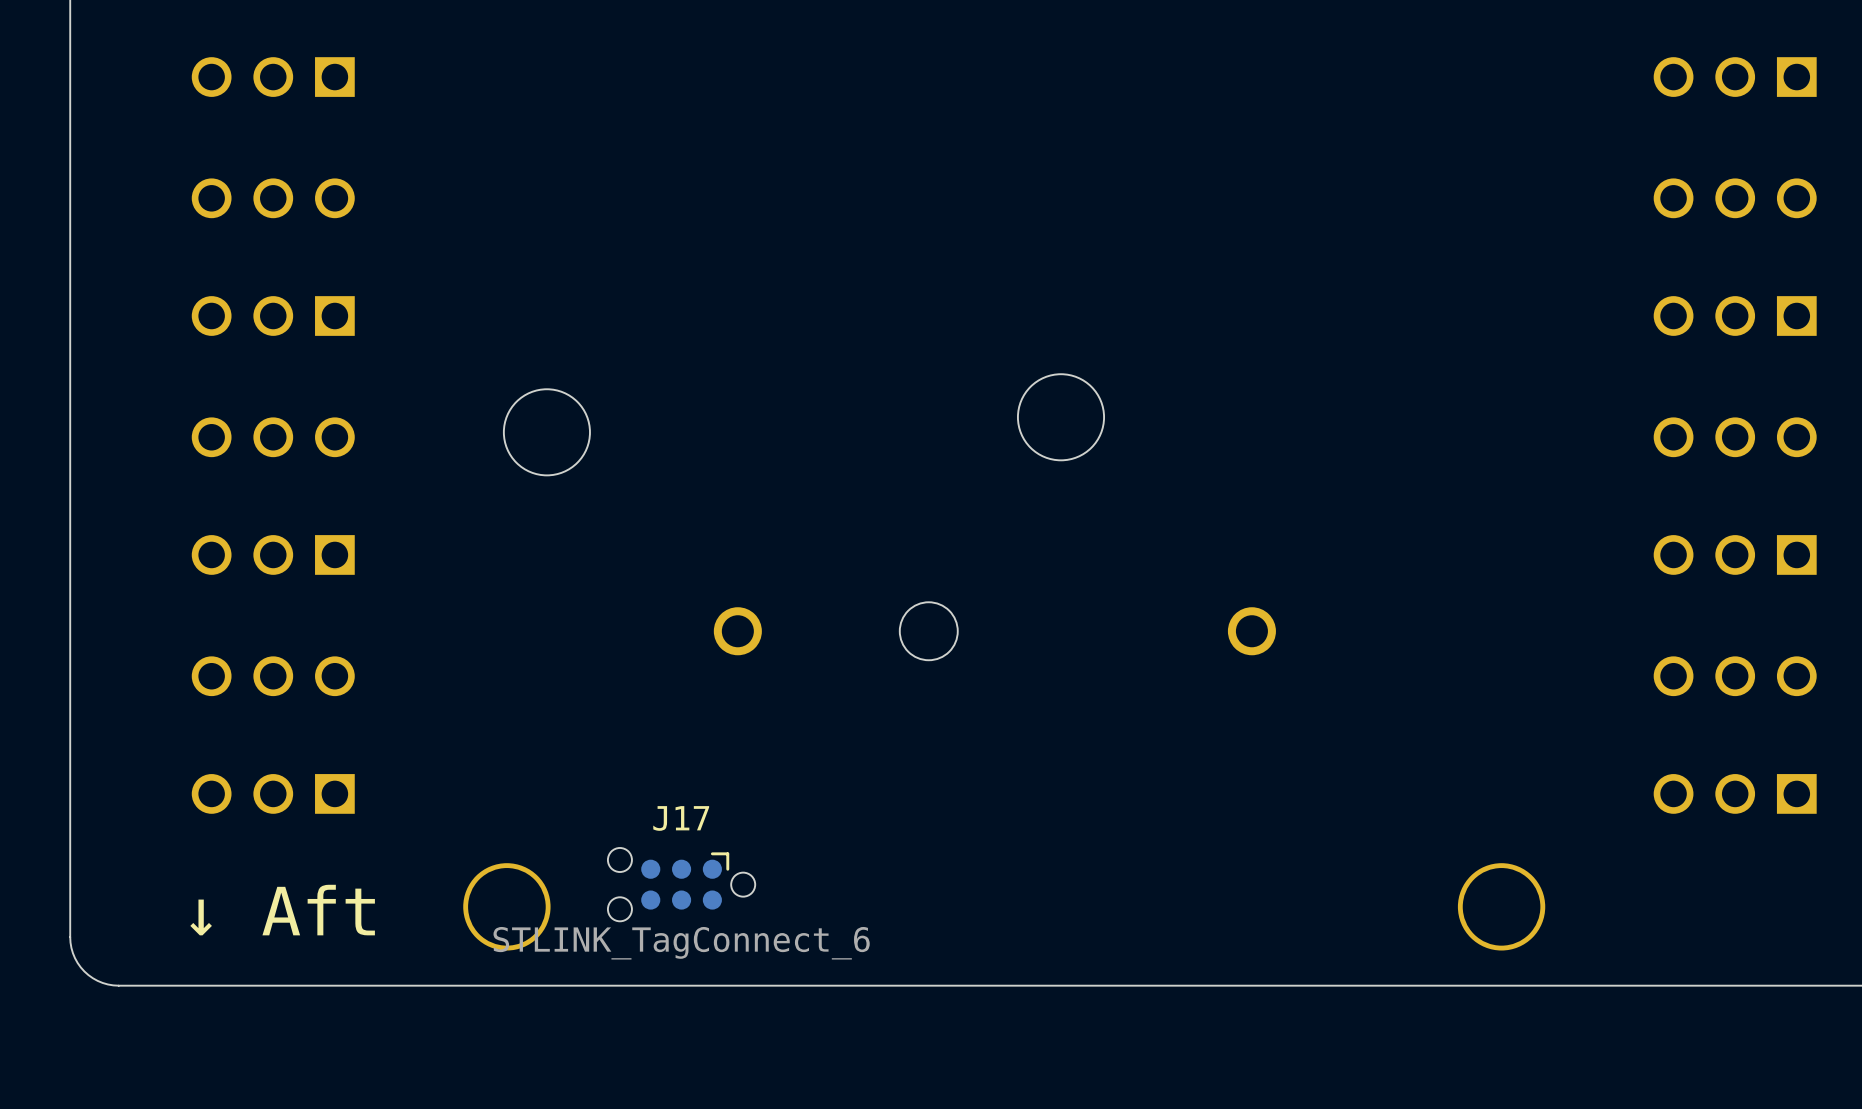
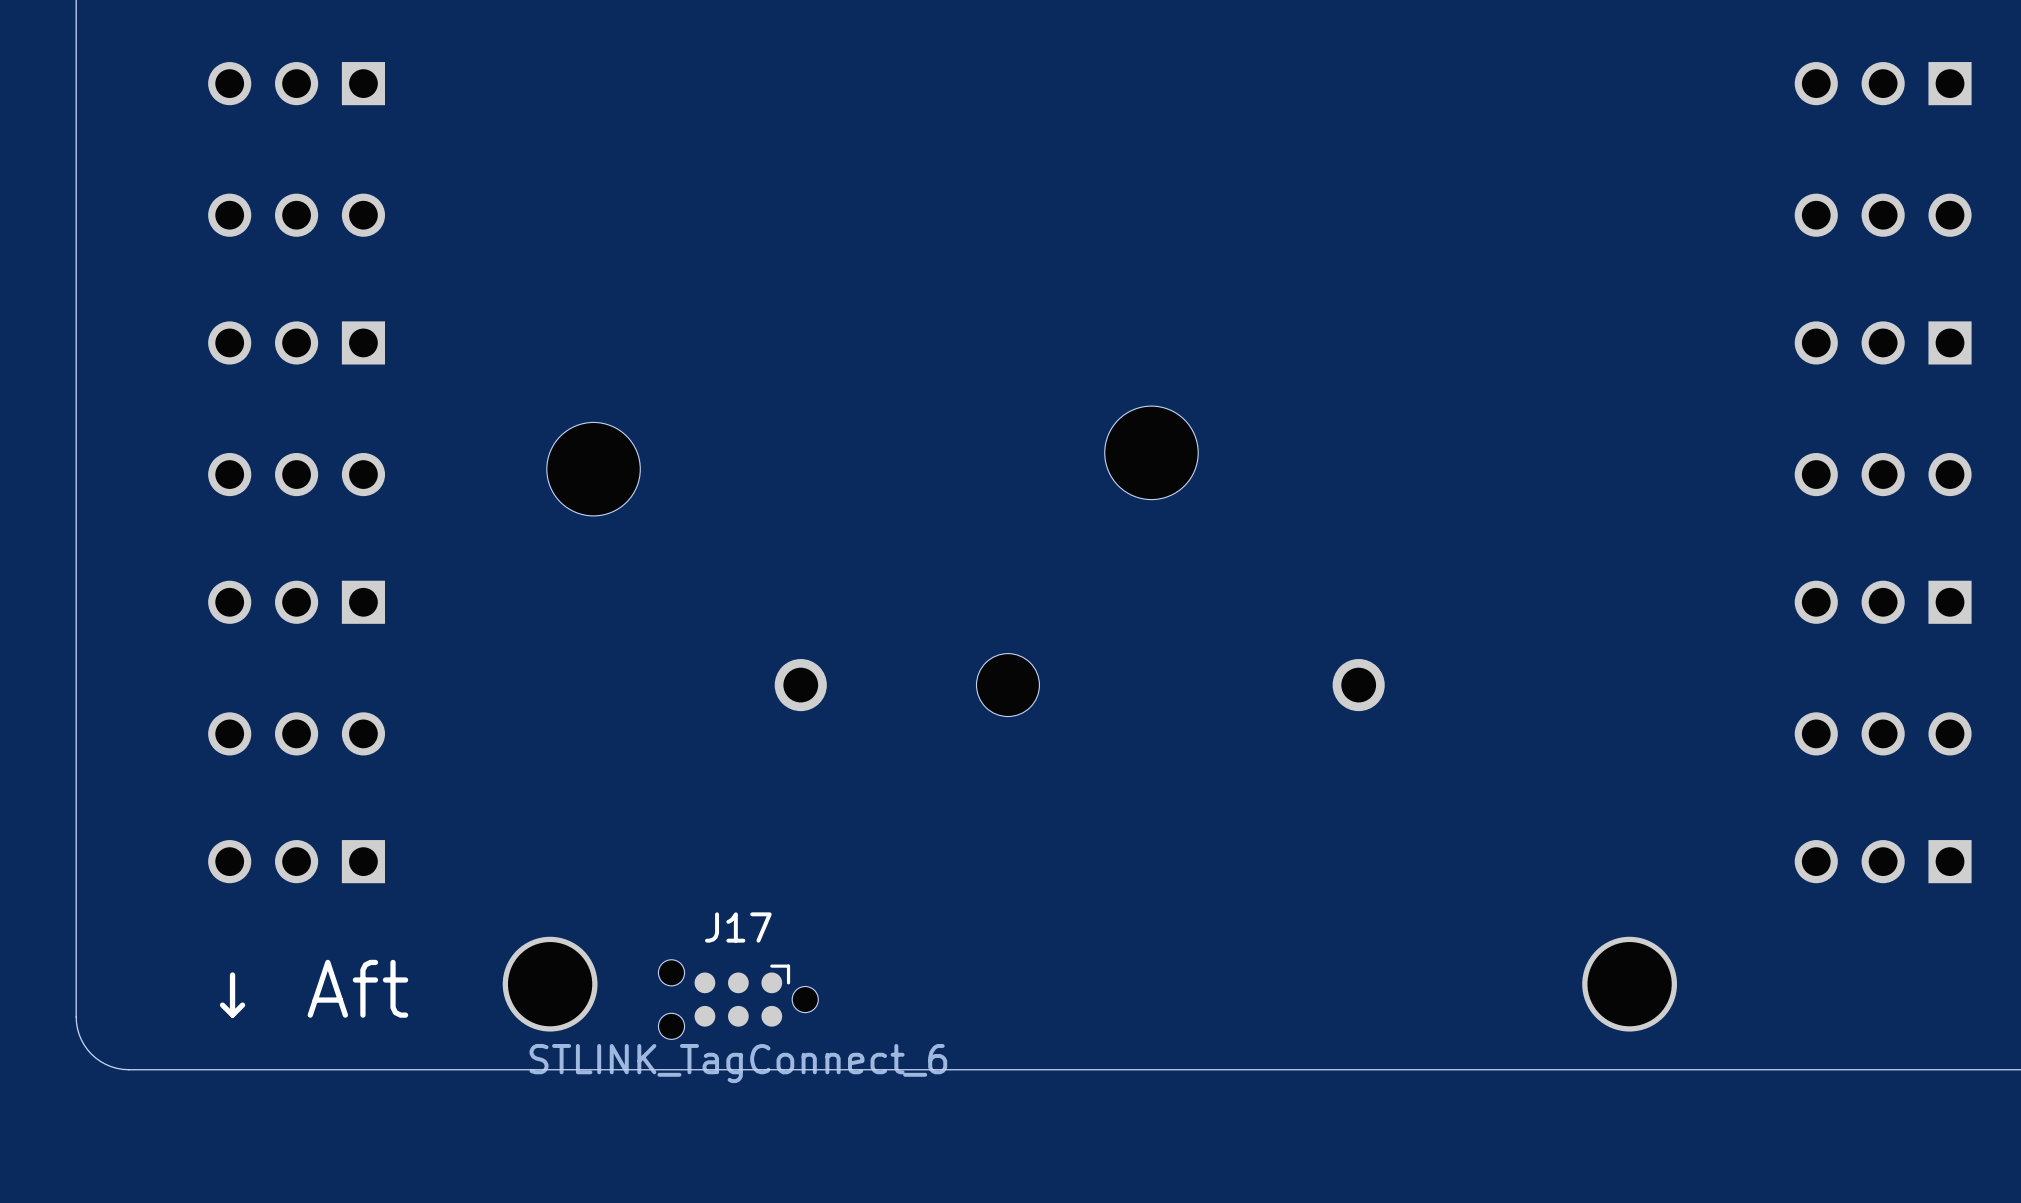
J17 position: (681, 884) -> (738, 999)

